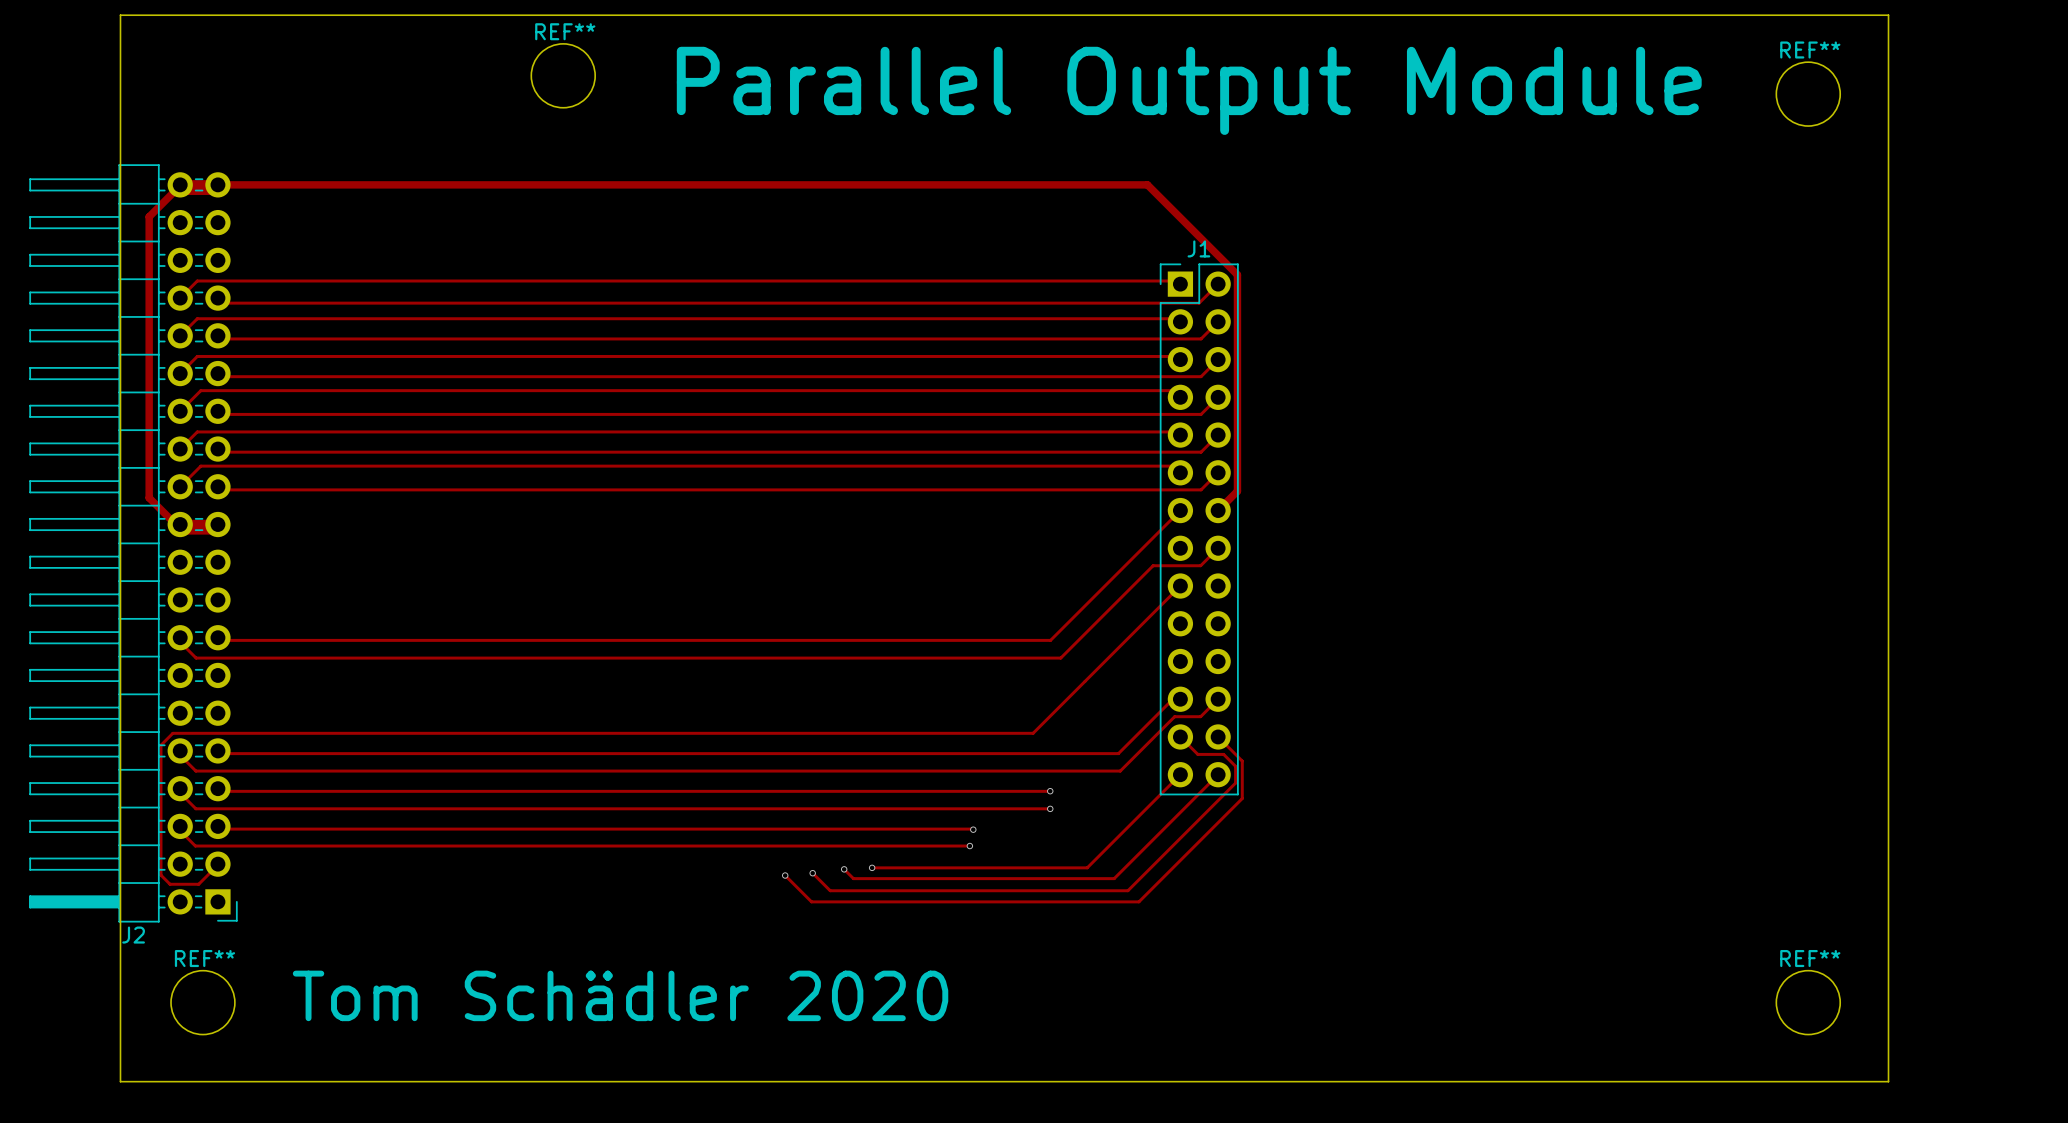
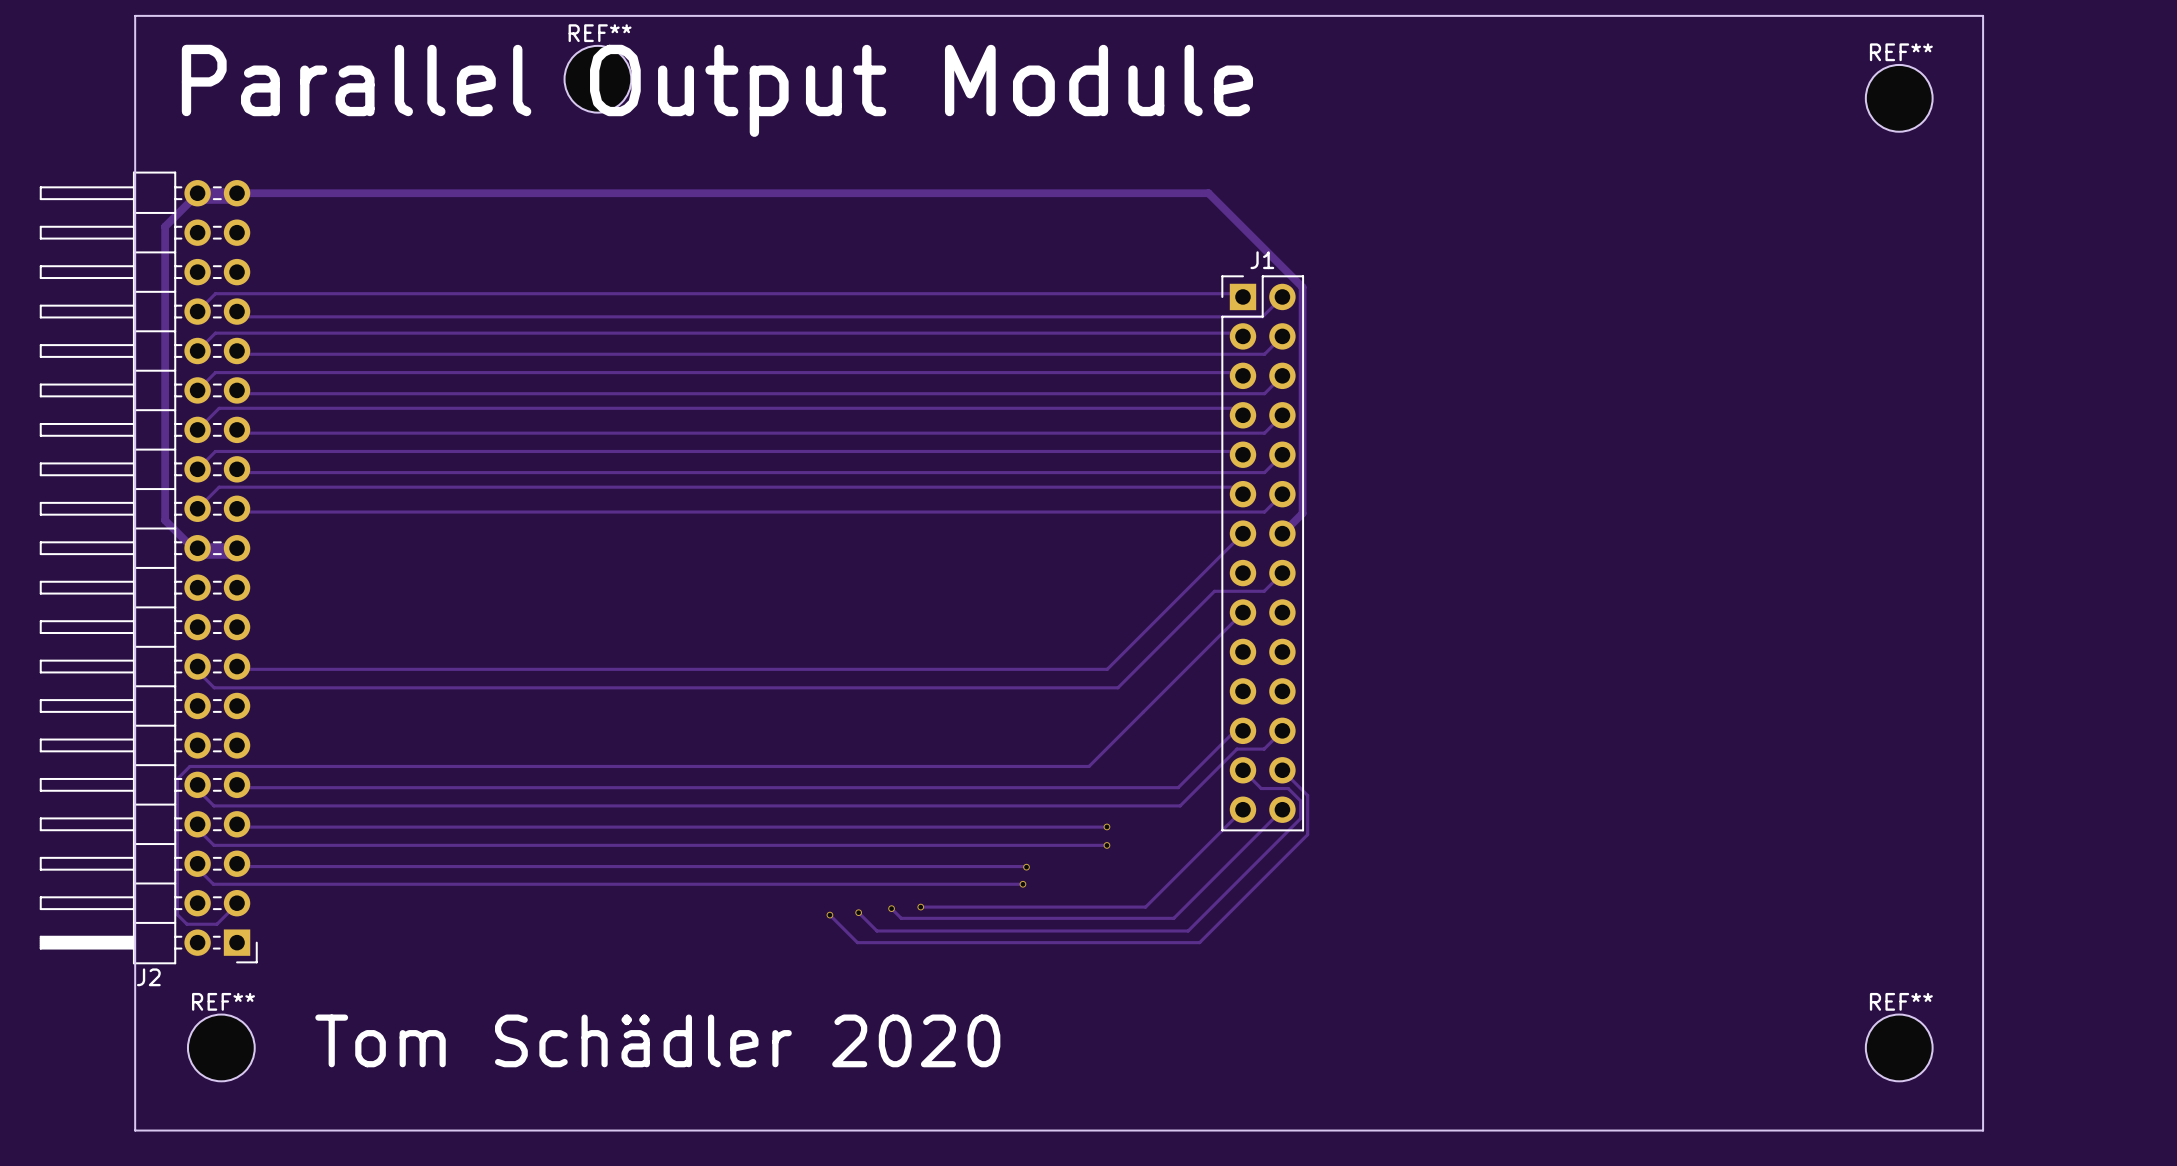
text: none -> Parallel Output Module (717, 90)
text: Parallel Output Module (1189, 90) -> none

